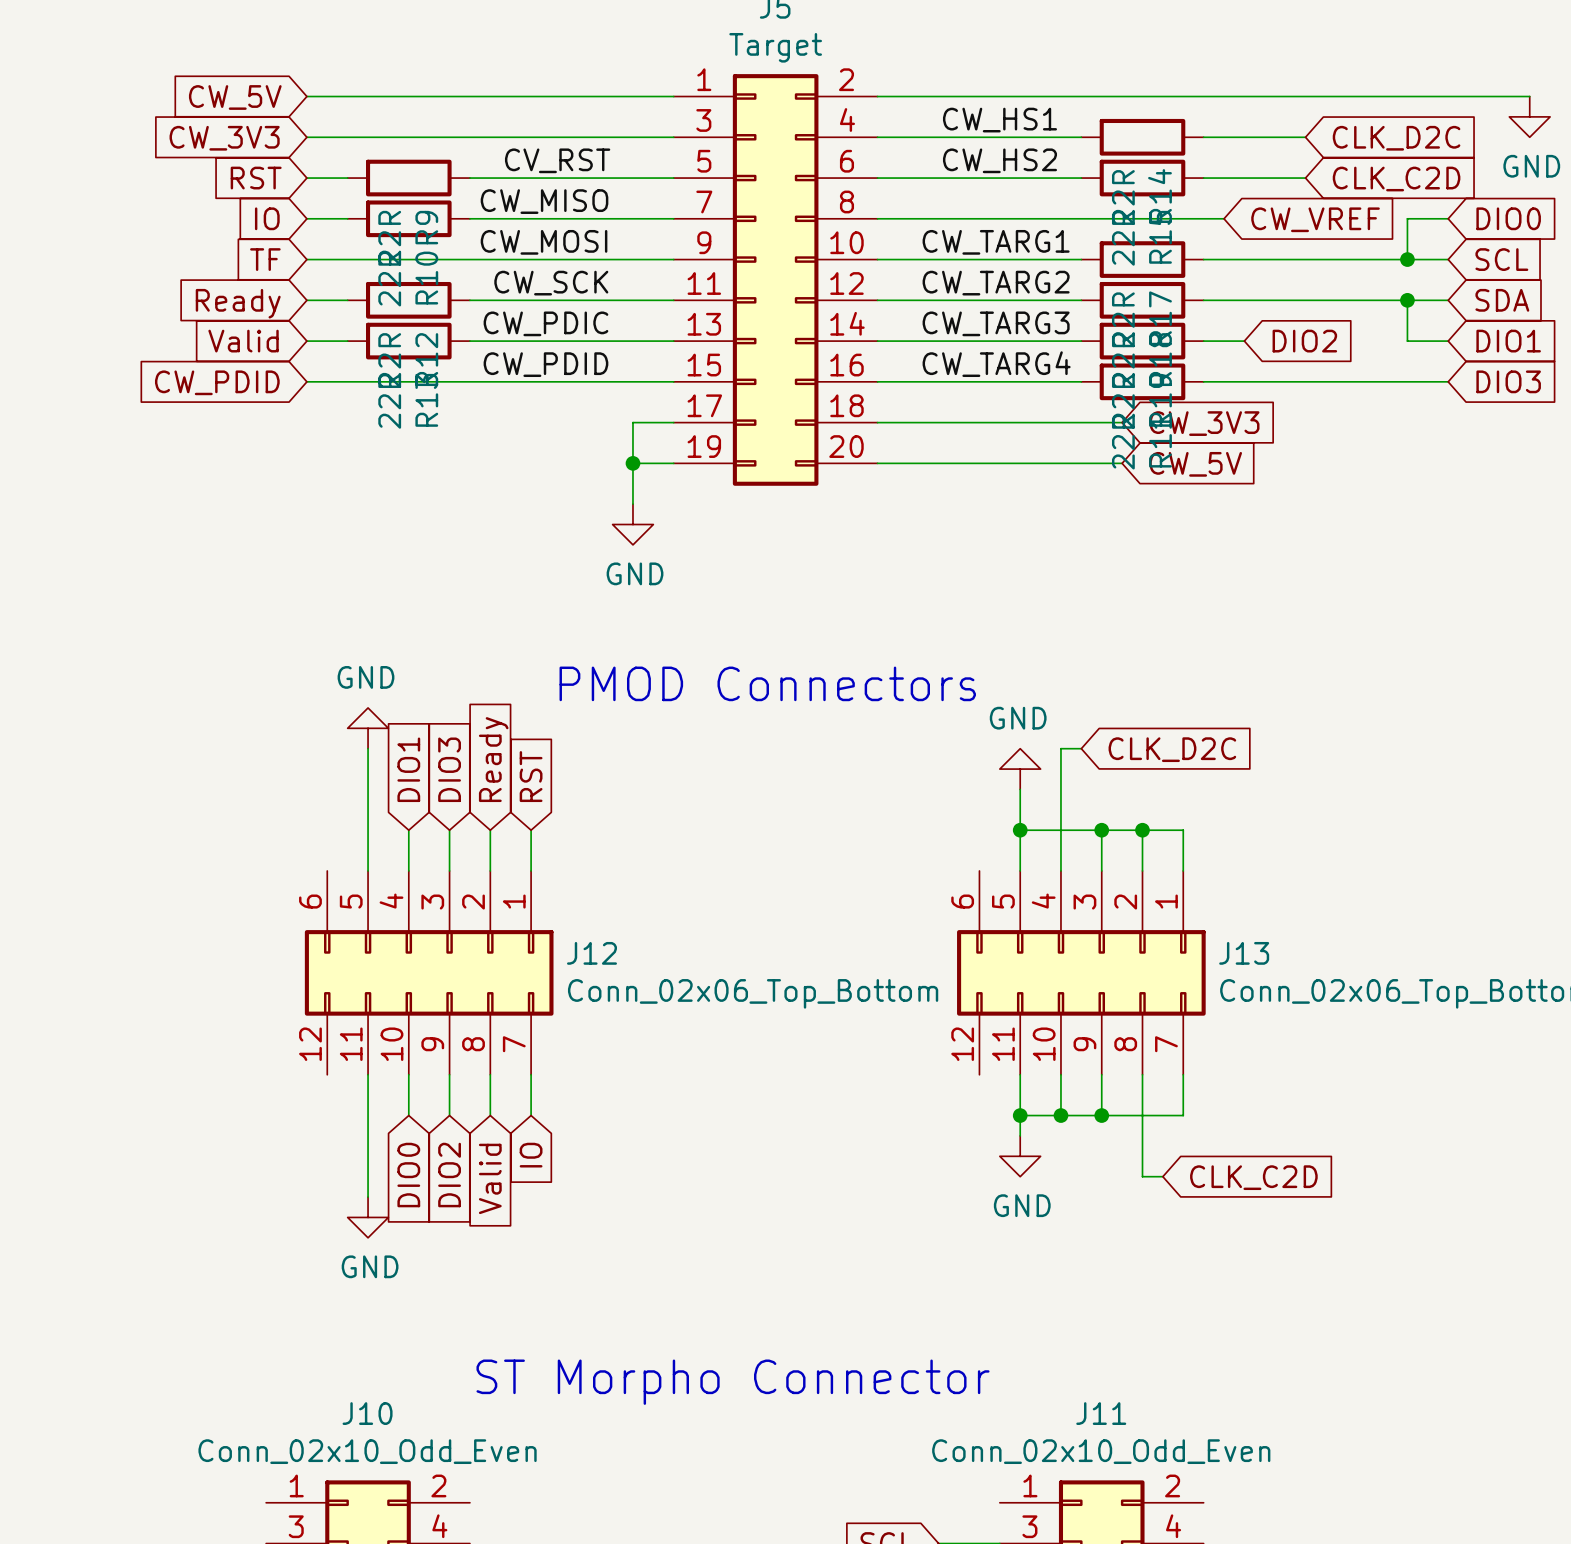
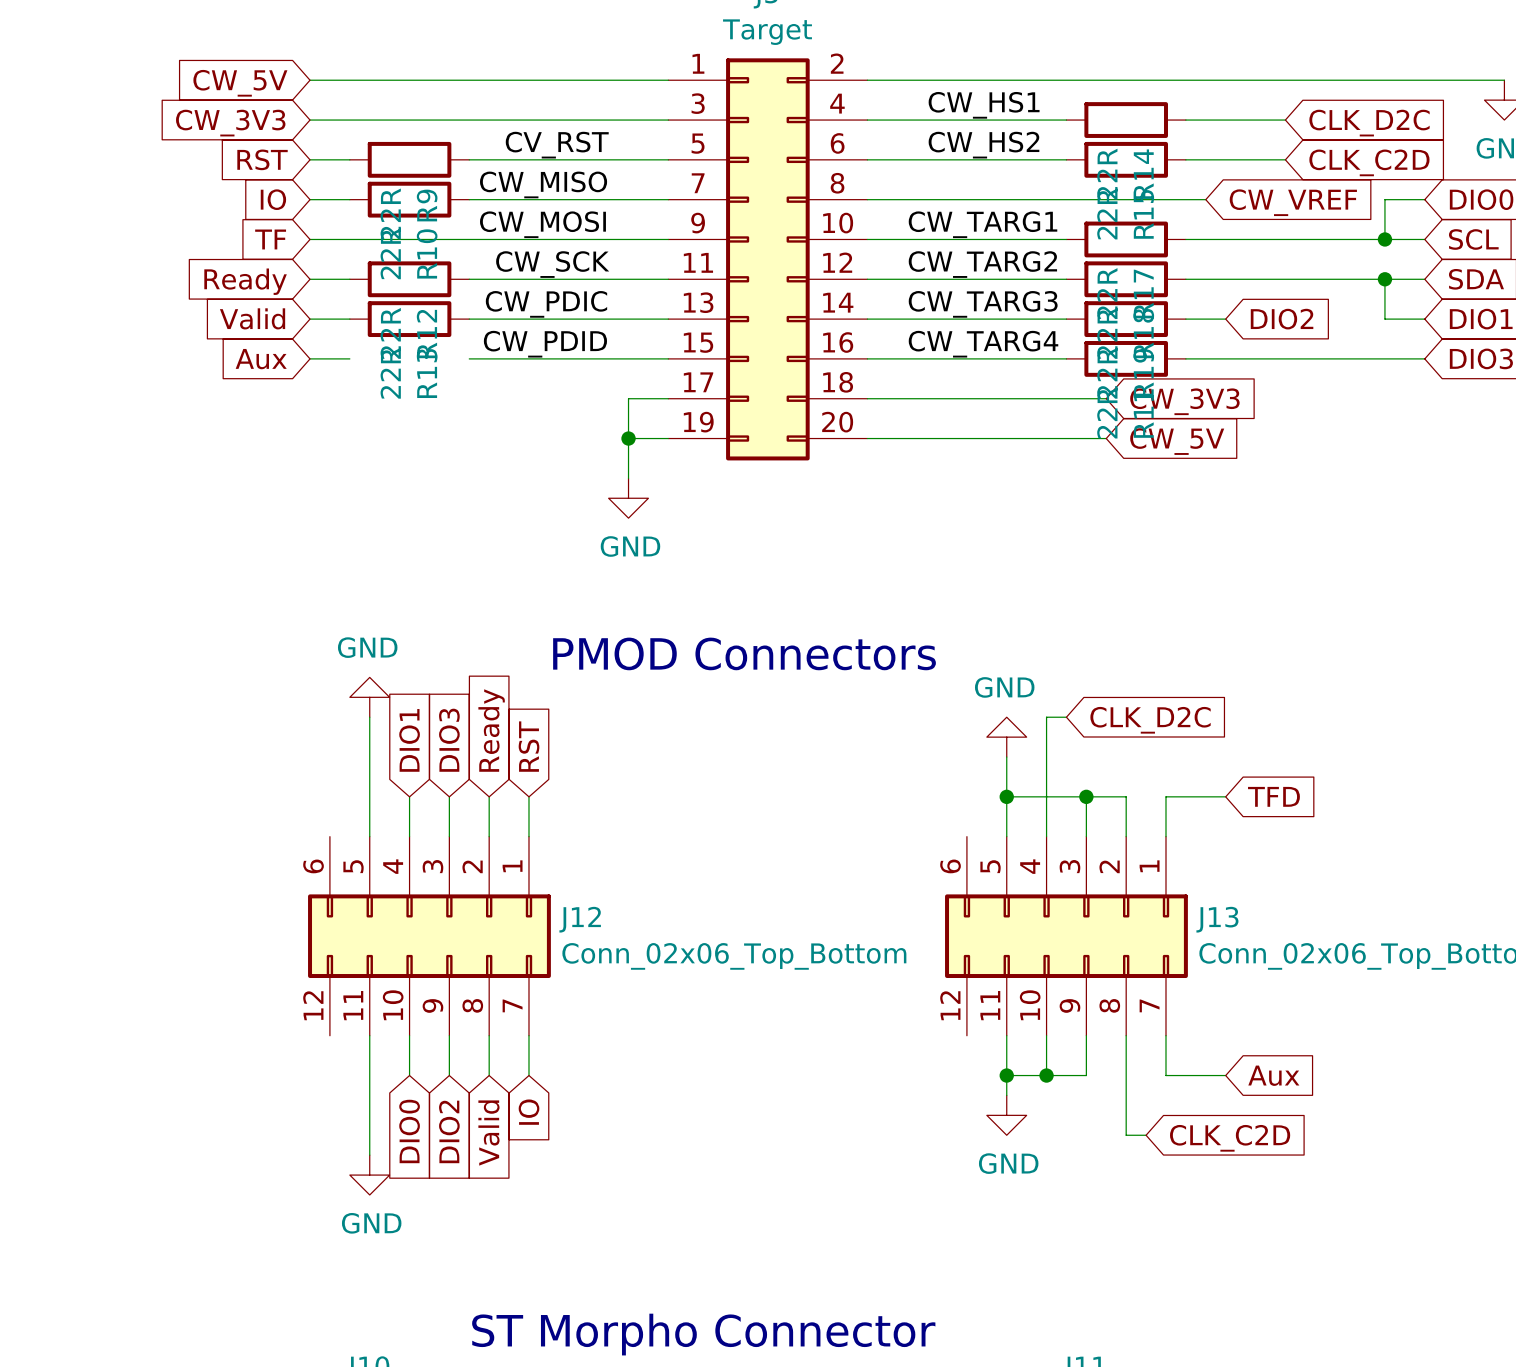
wire: (347, 381) (469, 381) -> none
global label: CW_PDID (217, 382) -> Aux (261, 359)
wire: (1142, 830) (1183, 830) -> (1225, 796) (1165, 796)
junction: (1142, 830) -> none
global label: none -> TFD (1273, 796)
wire: (1101, 1115) (1183, 1115) -> (1225, 1075) (1165, 1075)
junction: (1101, 1115) -> none
global label: none -> Aux (1273, 1075)

